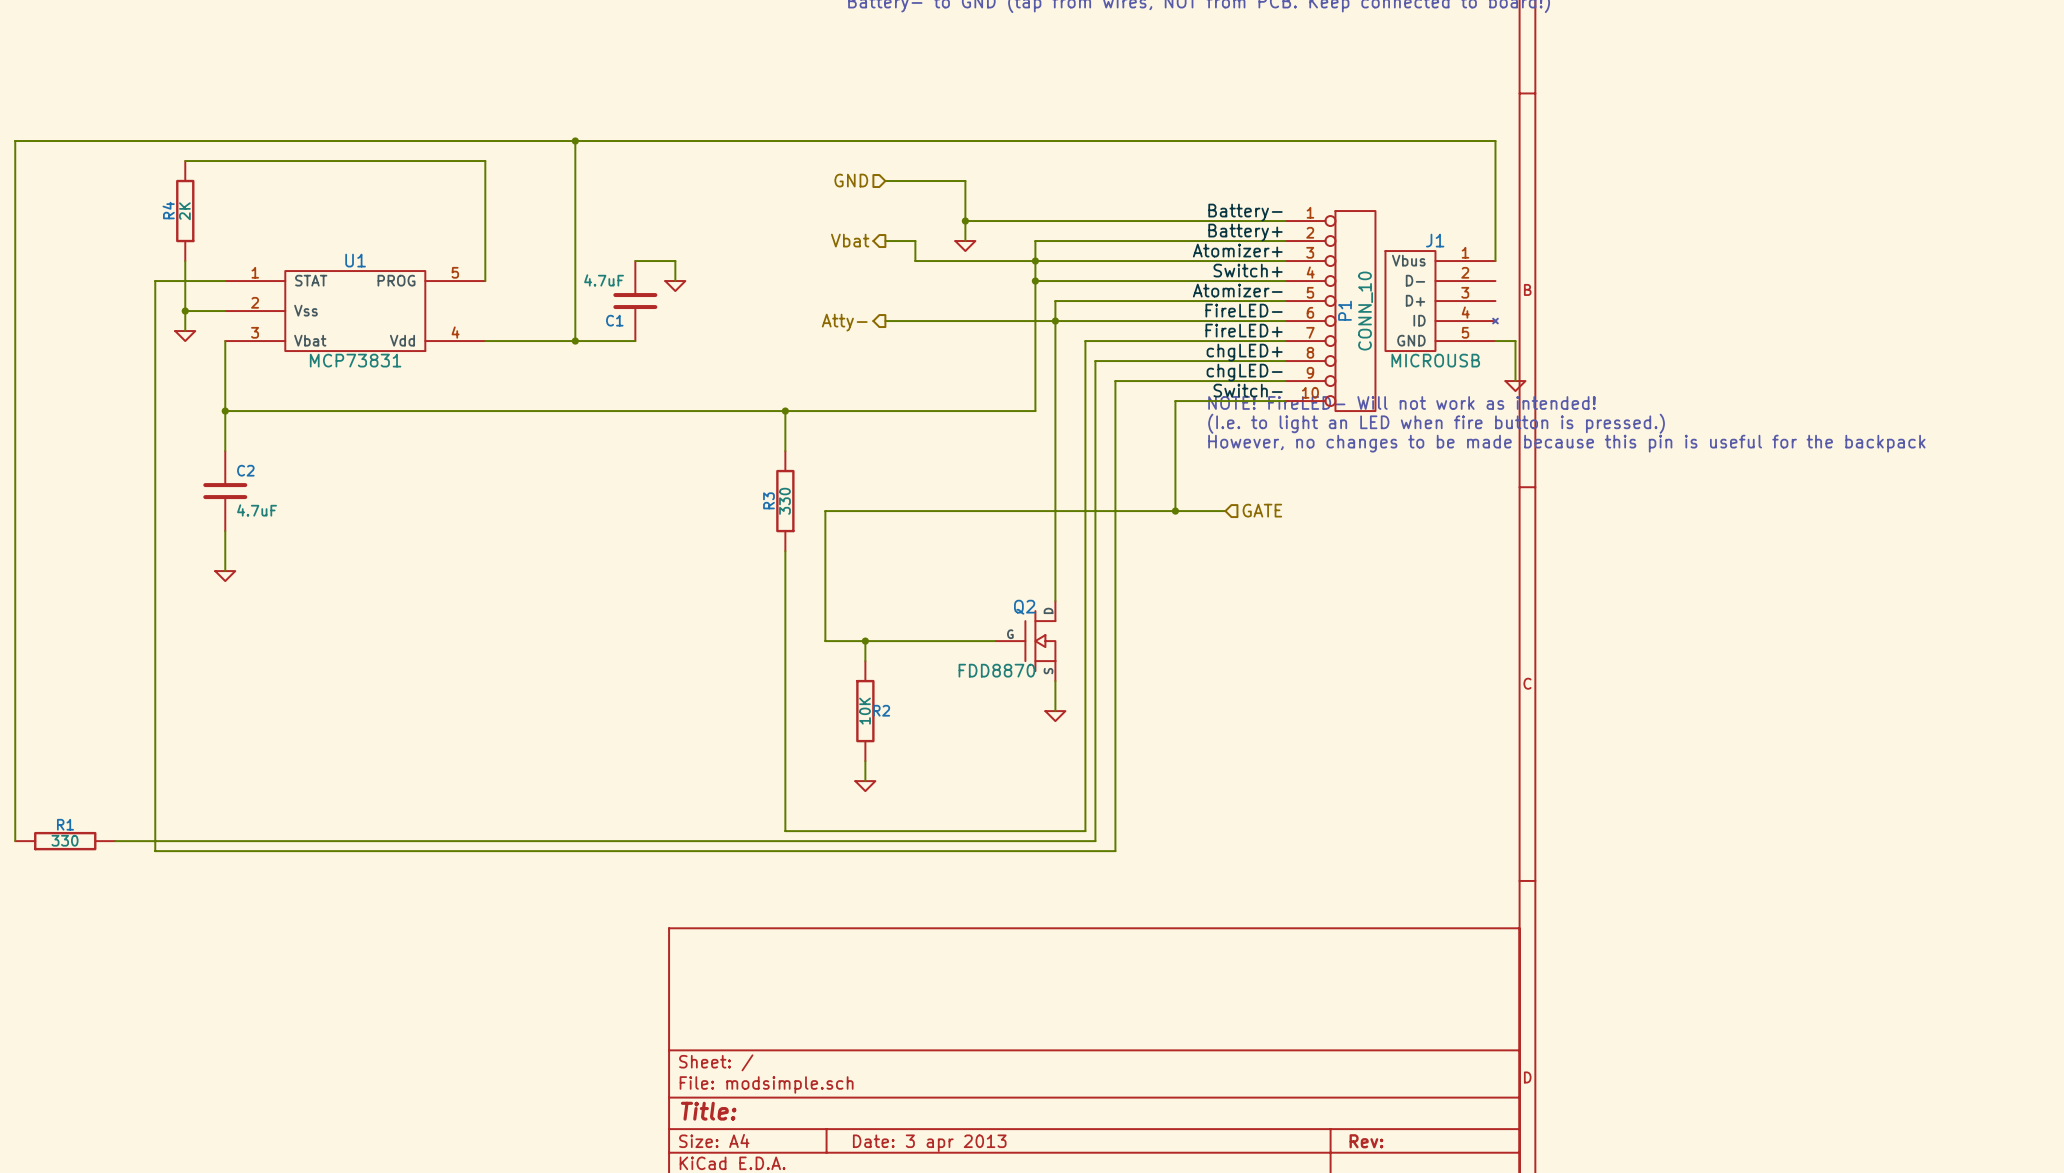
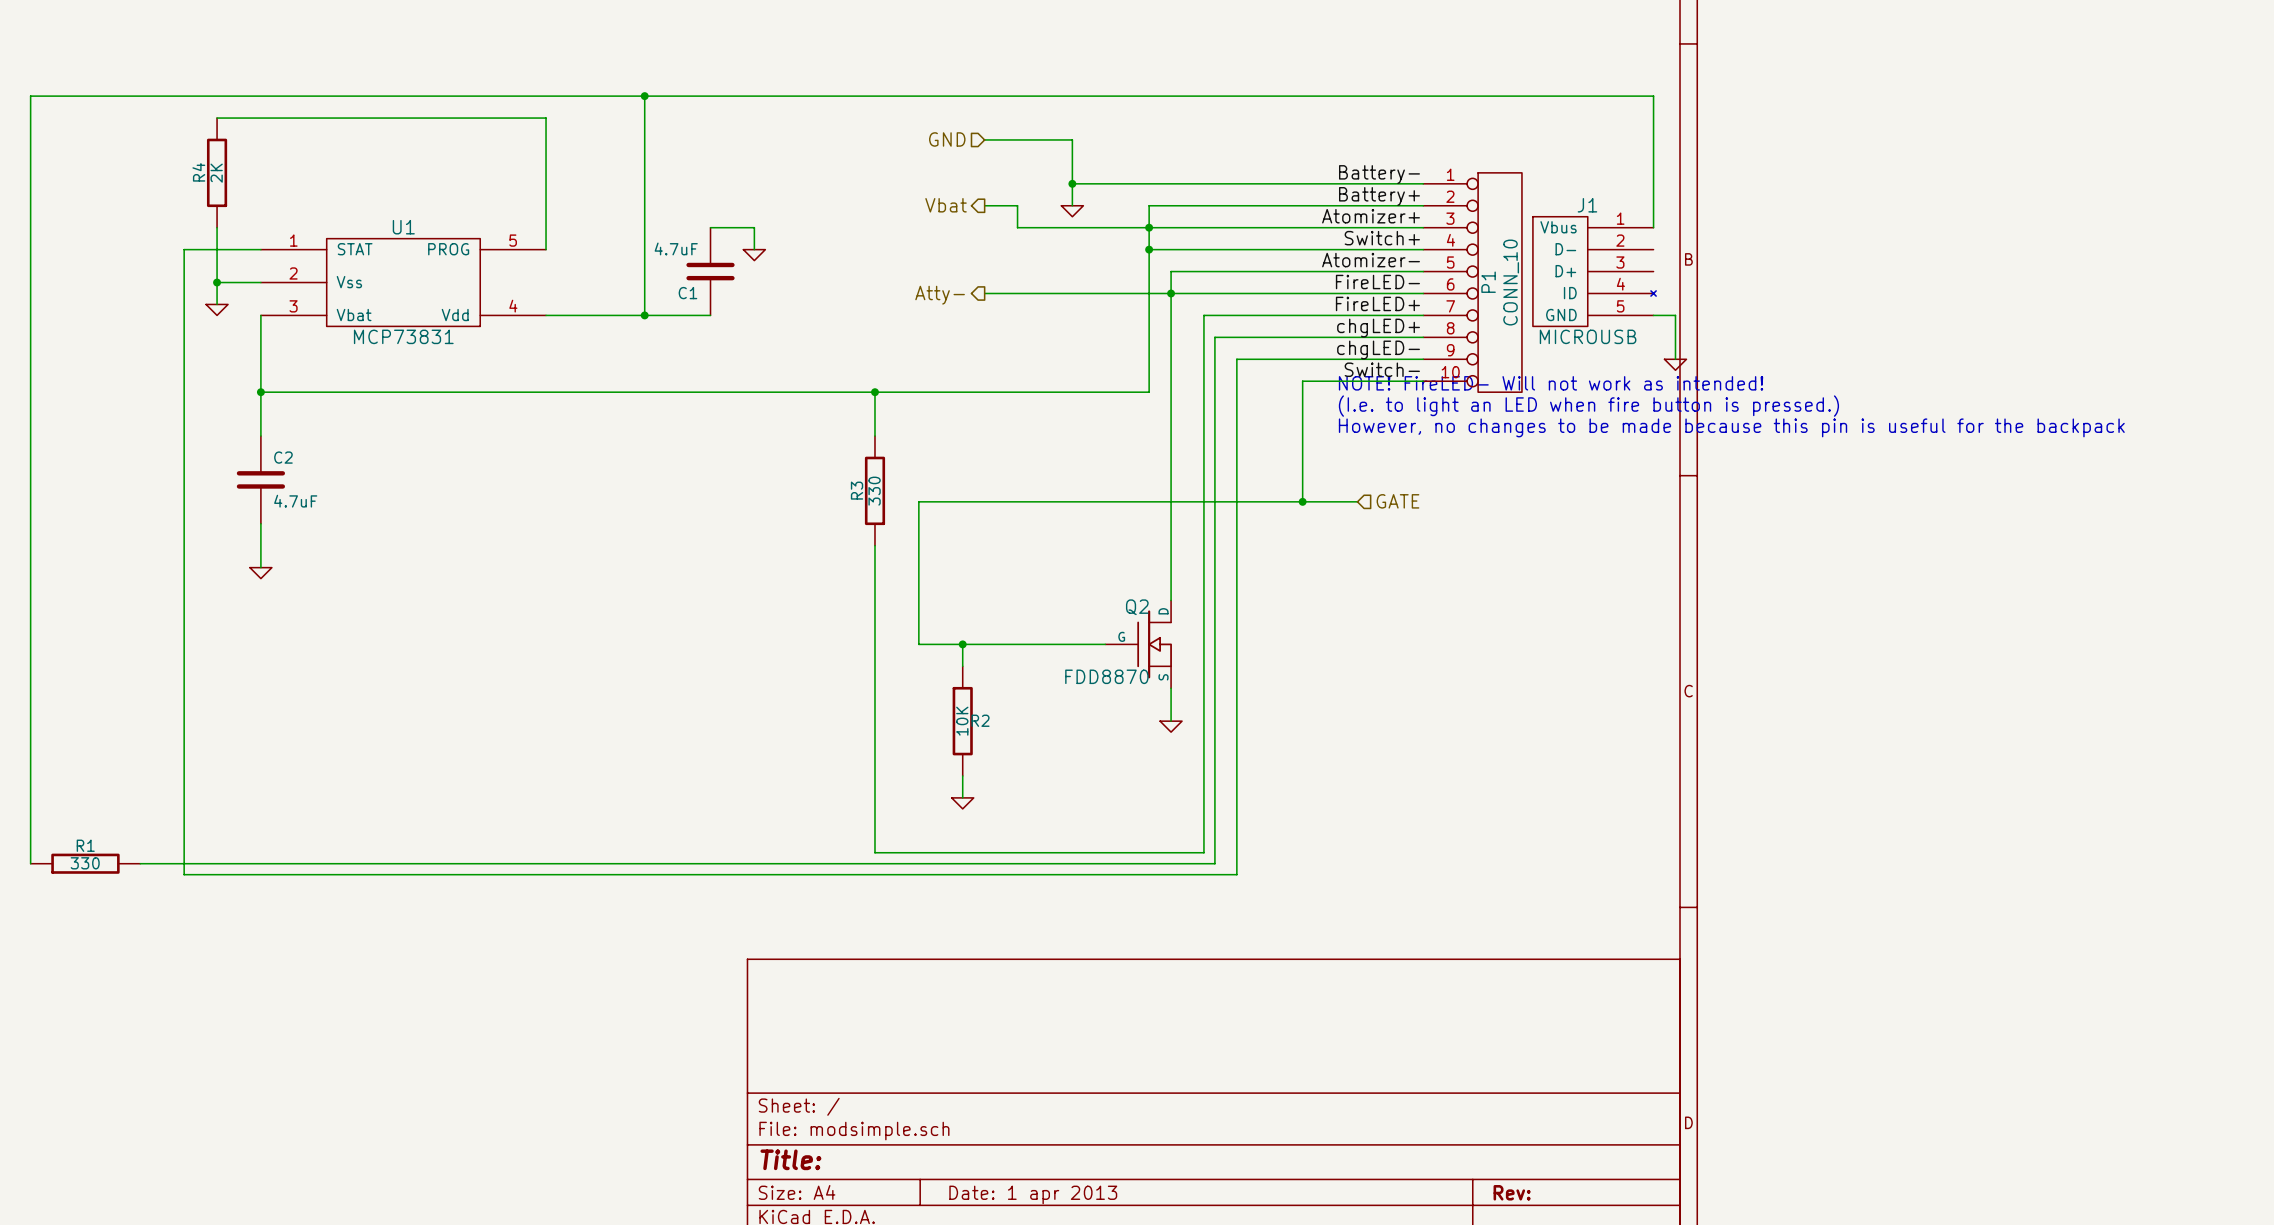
title block: Date: 3 apr 2013 (929, 1143) -> Date: 1 apr 2013 (1033, 1194)

